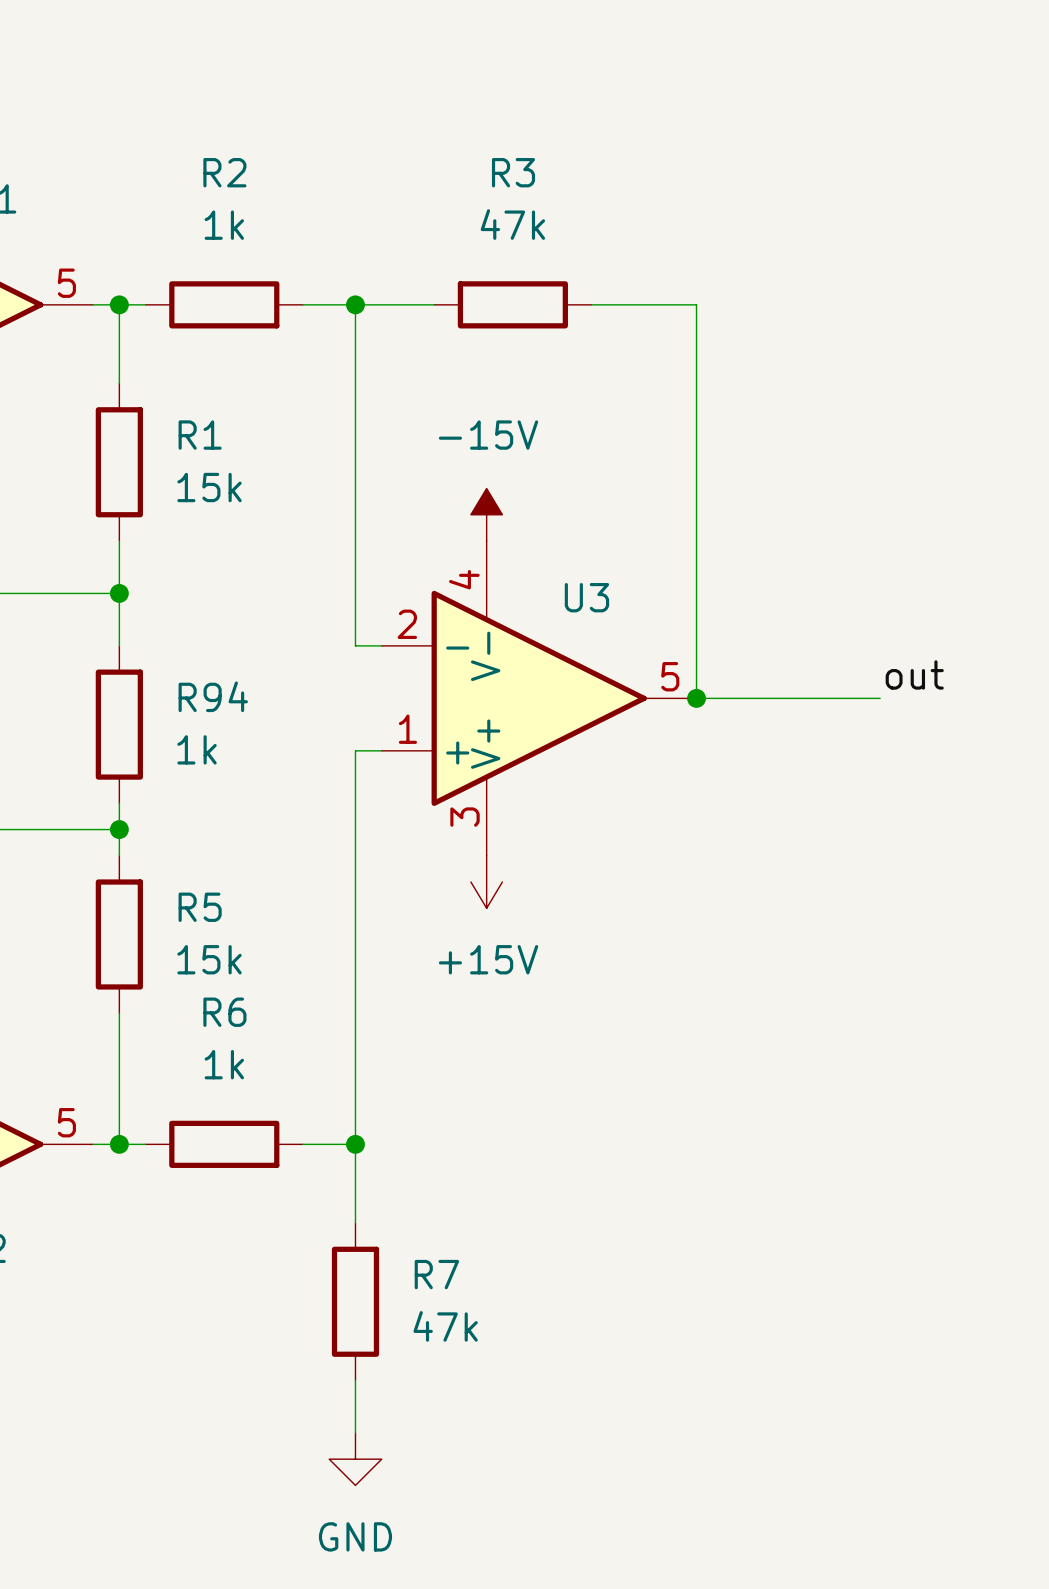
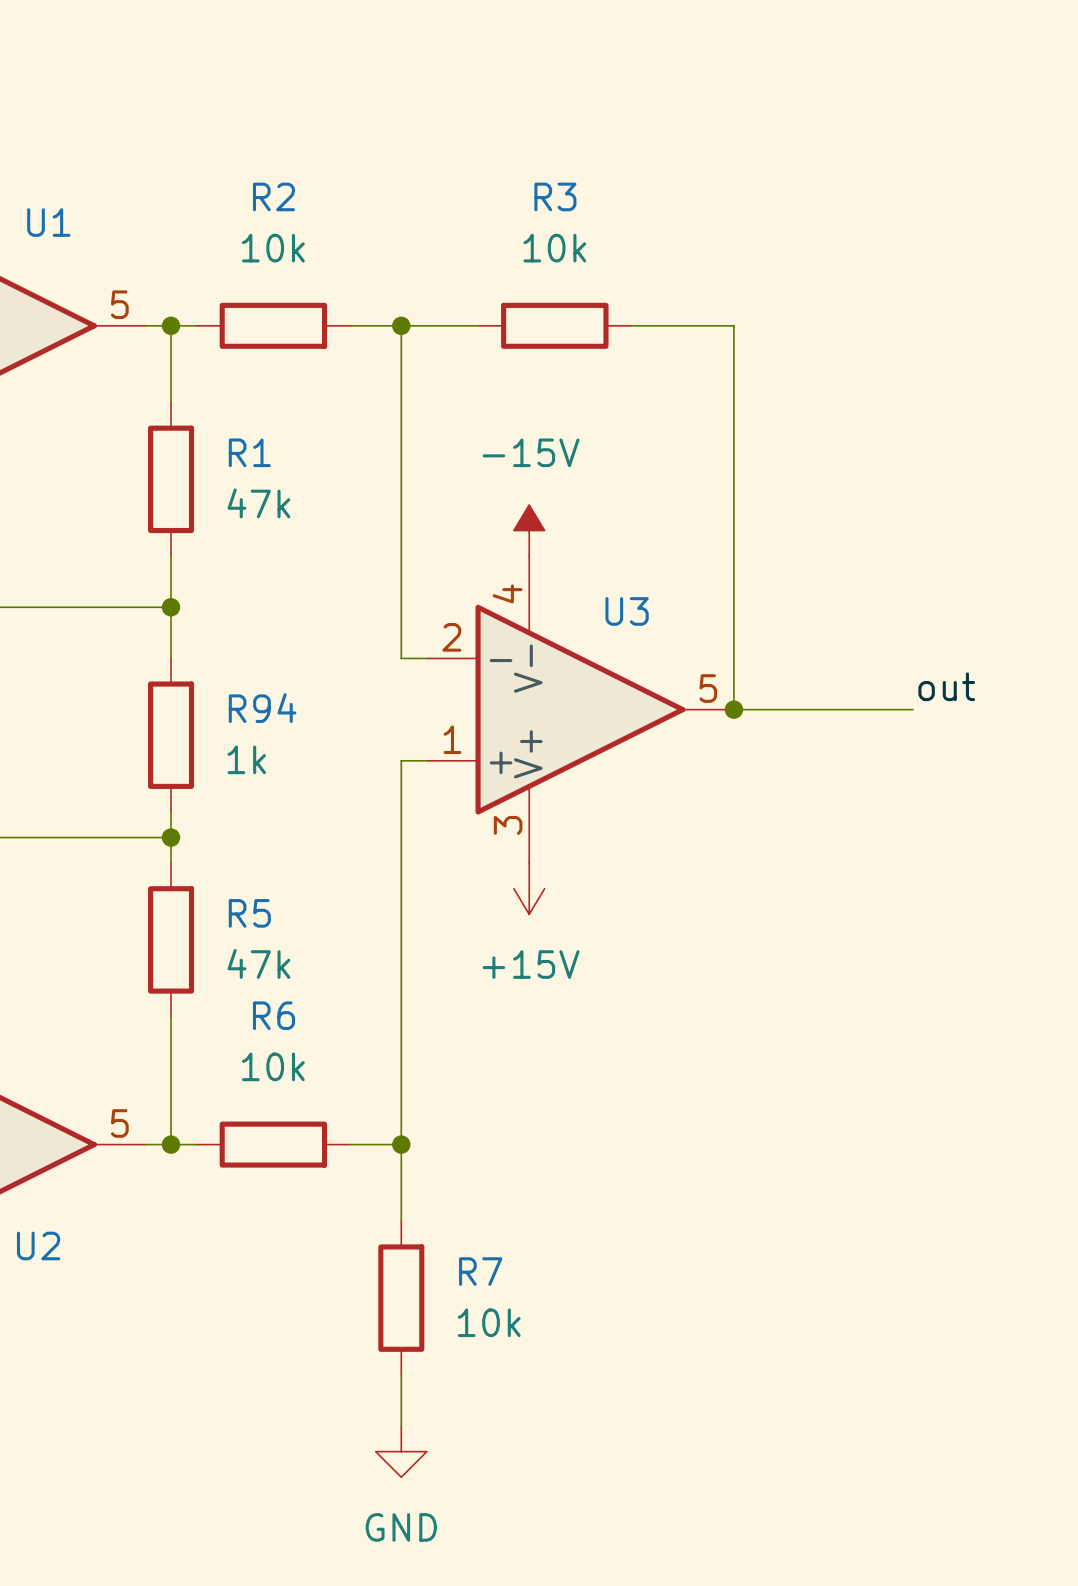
R3 value: 47k (512, 224) -> 10k (554, 248)
R2 value: 1k (224, 225) -> 10k (273, 248)
R1 value: 15k (209, 487) -> 47k (258, 503)
R5 value: 15k (209, 959) -> 47k (258, 963)
R6 value: 1k (224, 1064) -> 10k (273, 1066)
R7 value: 47k (445, 1326) -> 10k (489, 1322)

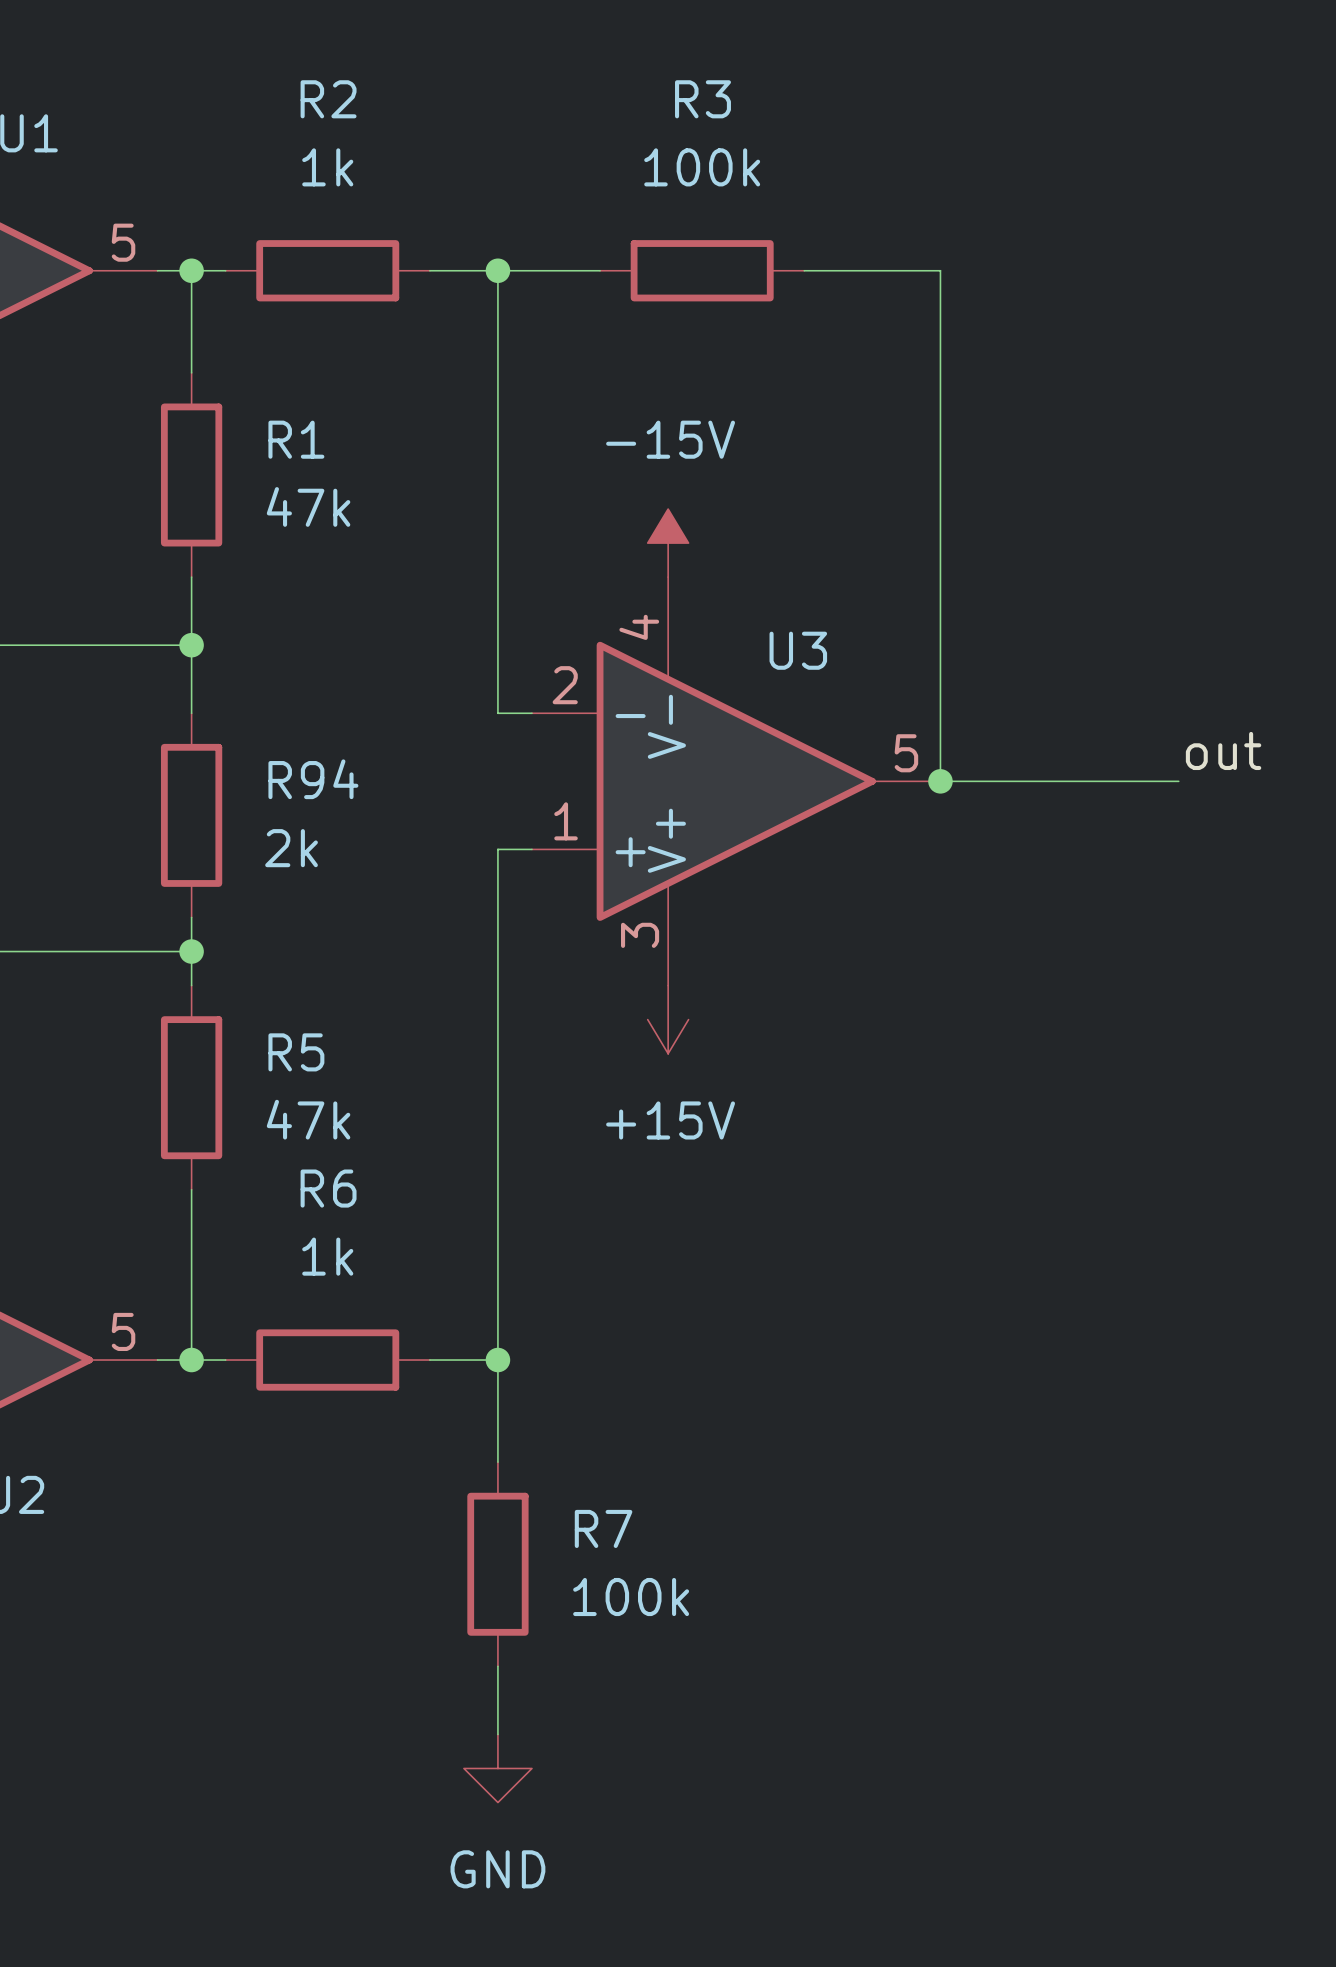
R2 value: 10k (273, 248) -> 1k (327, 167)
R3 value: 10k (554, 248) -> 100k (702, 167)
R94 value: 1k (246, 759) -> 2k (291, 848)
R6 value: 10k (273, 1066) -> 1k (327, 1256)
R7 value: 10k (489, 1322) -> 100k (631, 1597)

